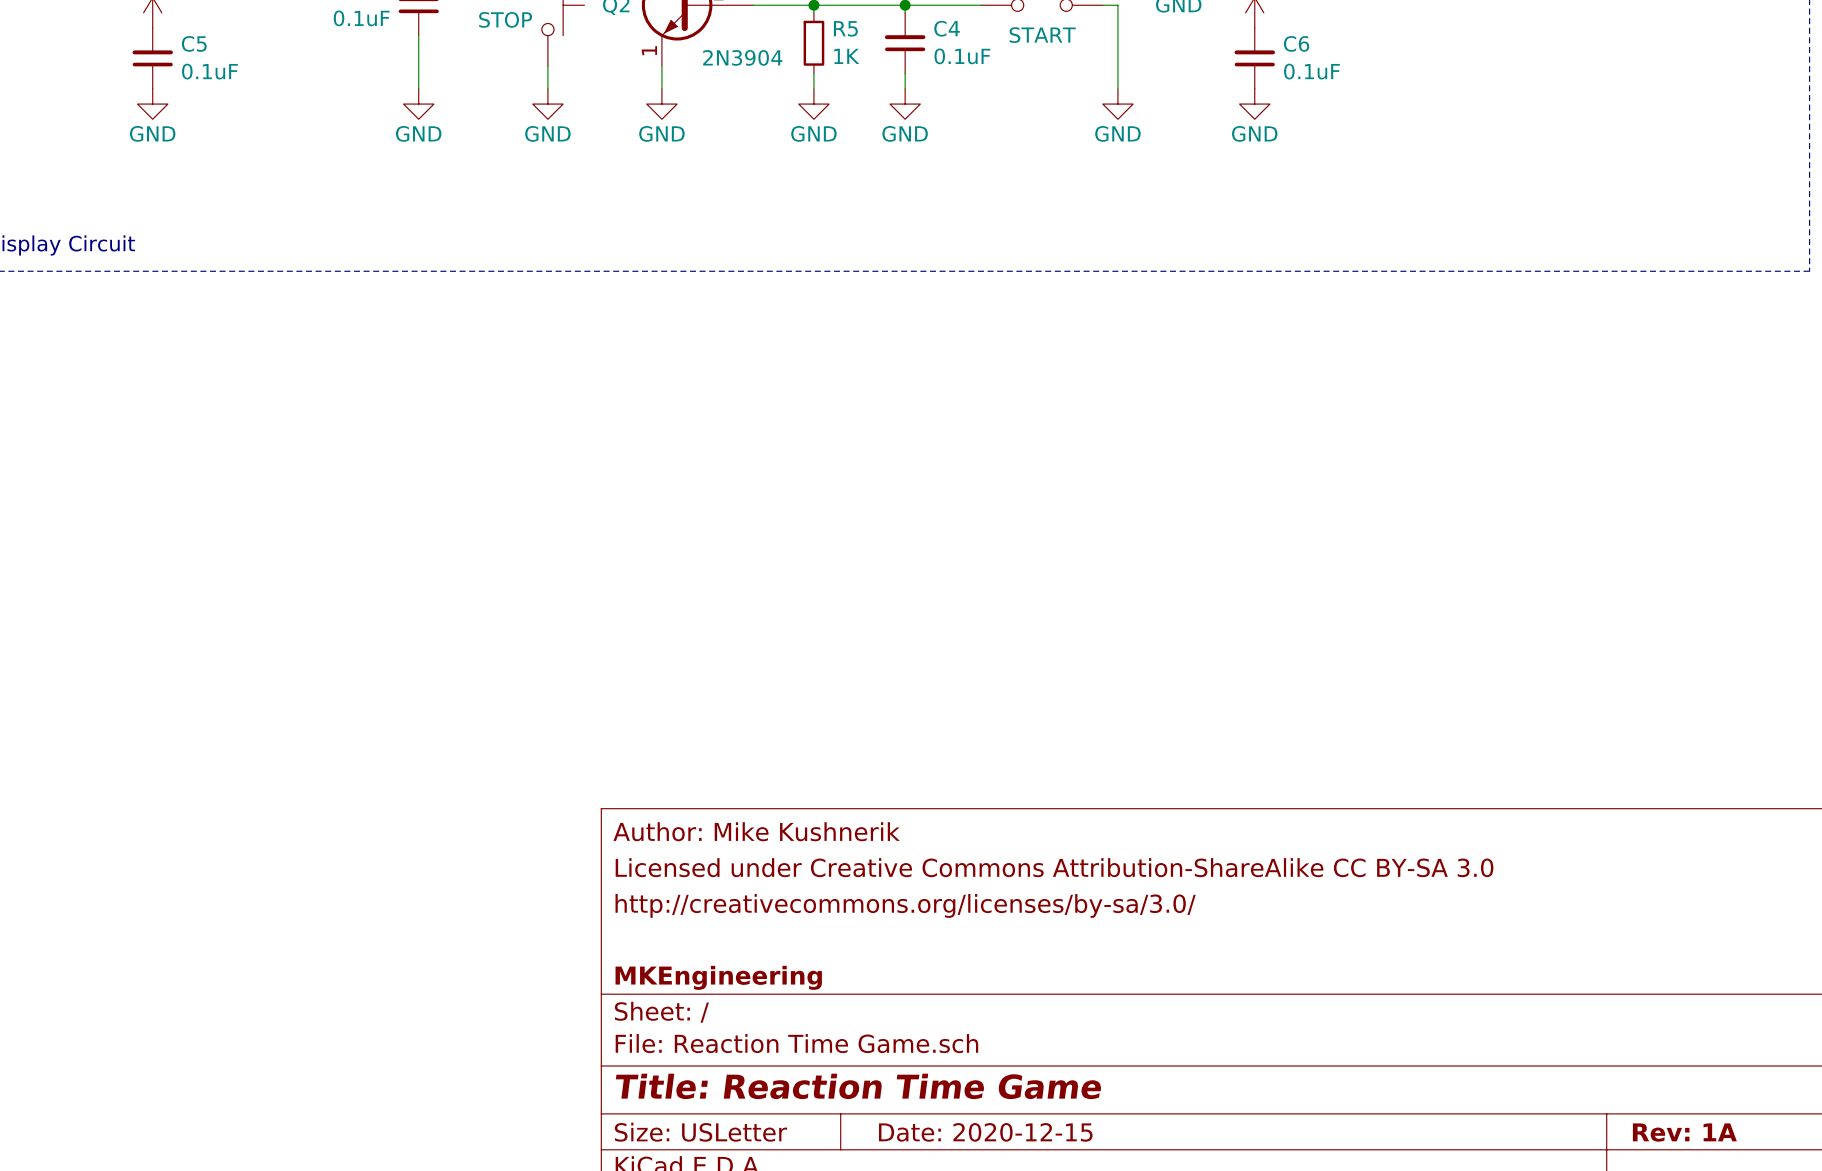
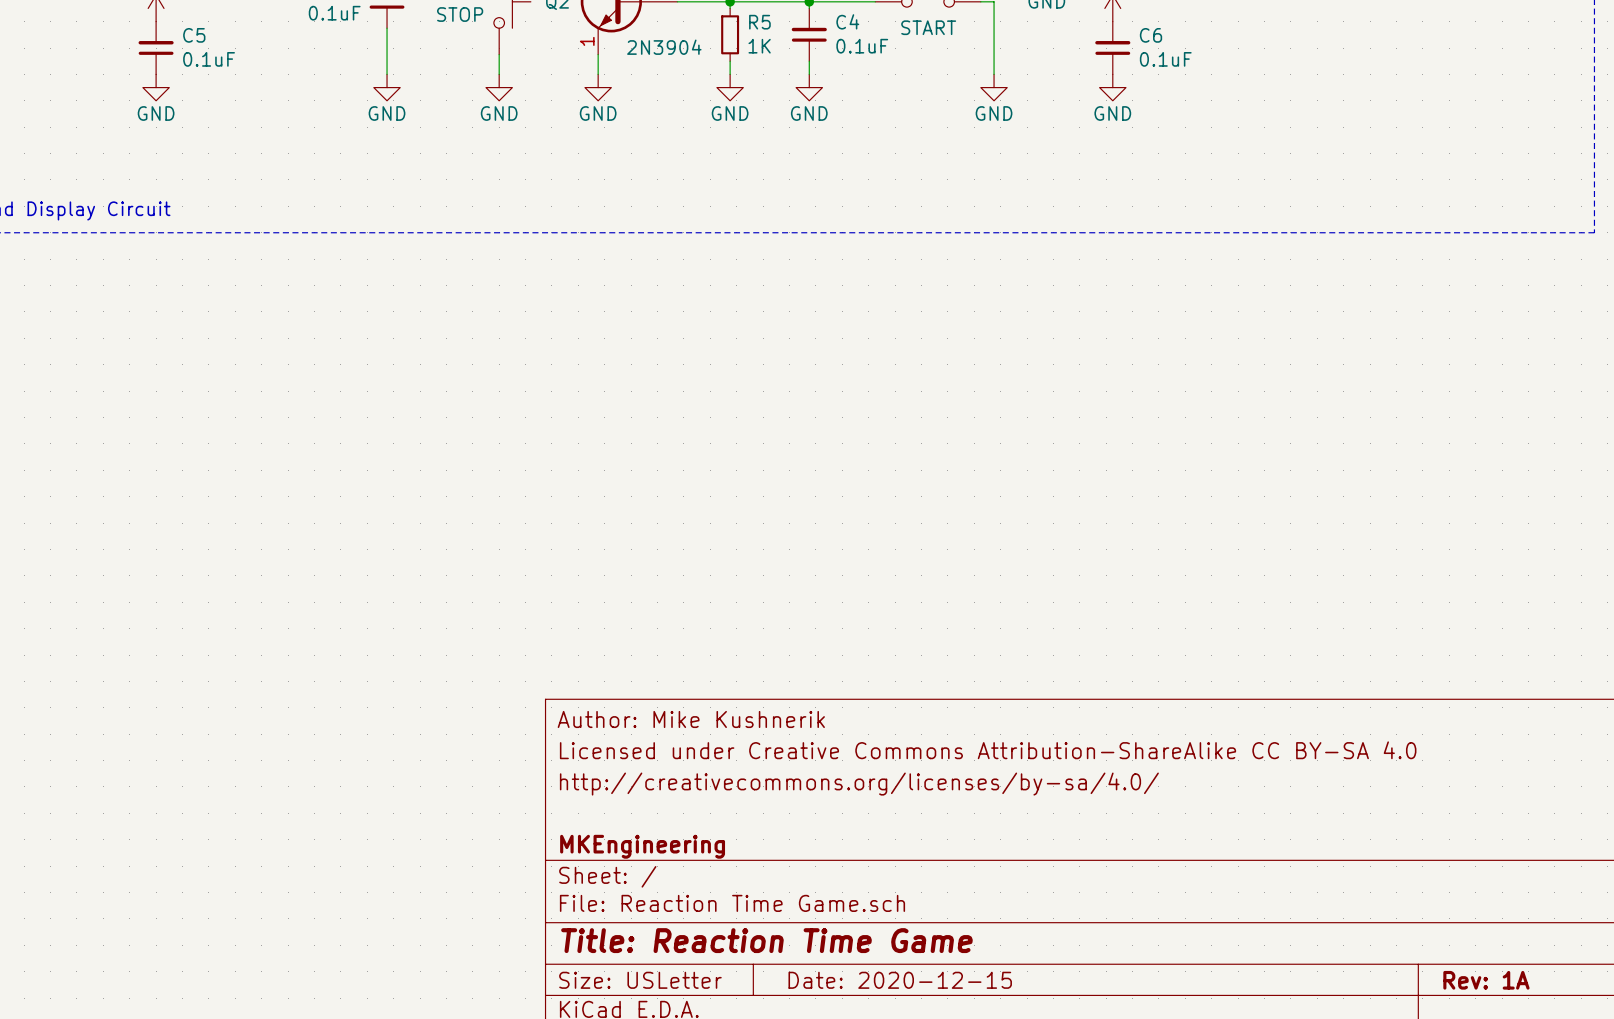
title block: Licensed under Creative Commons Attribution-ShareAlike CC BY-SA 3.0 (1054, 867) -> Licensed under Creative Commons Attribution-ShareAlike CC BY-SA 4.0 (988, 750)
title block: http://creativecommons.org/licenses/by-sa/3.0/ (905, 905) -> http://creativecommons.org/licenses/by-sa/4.0/ (859, 784)

